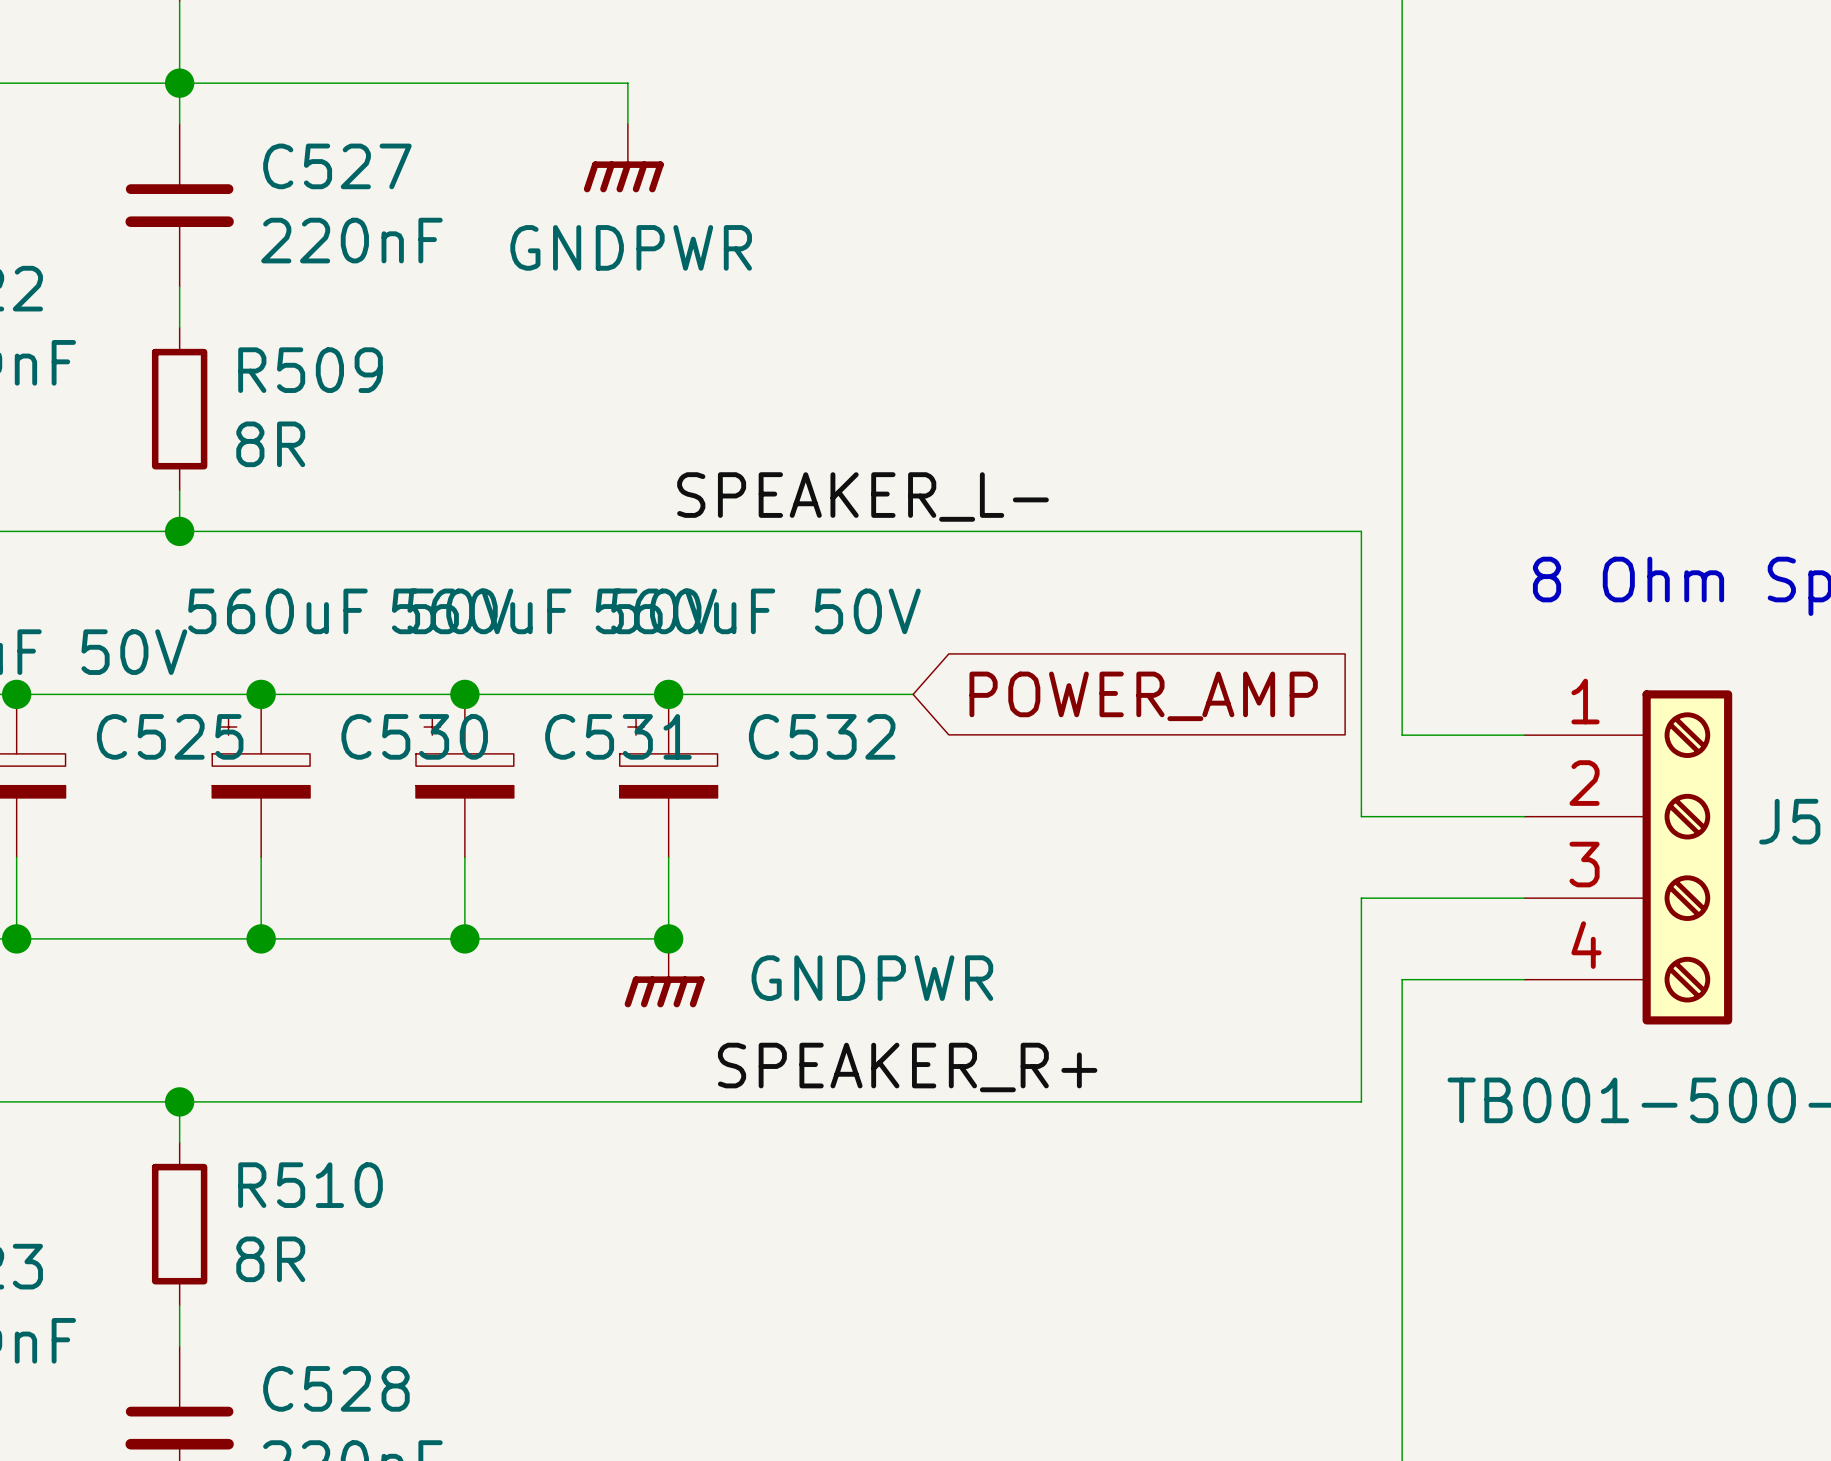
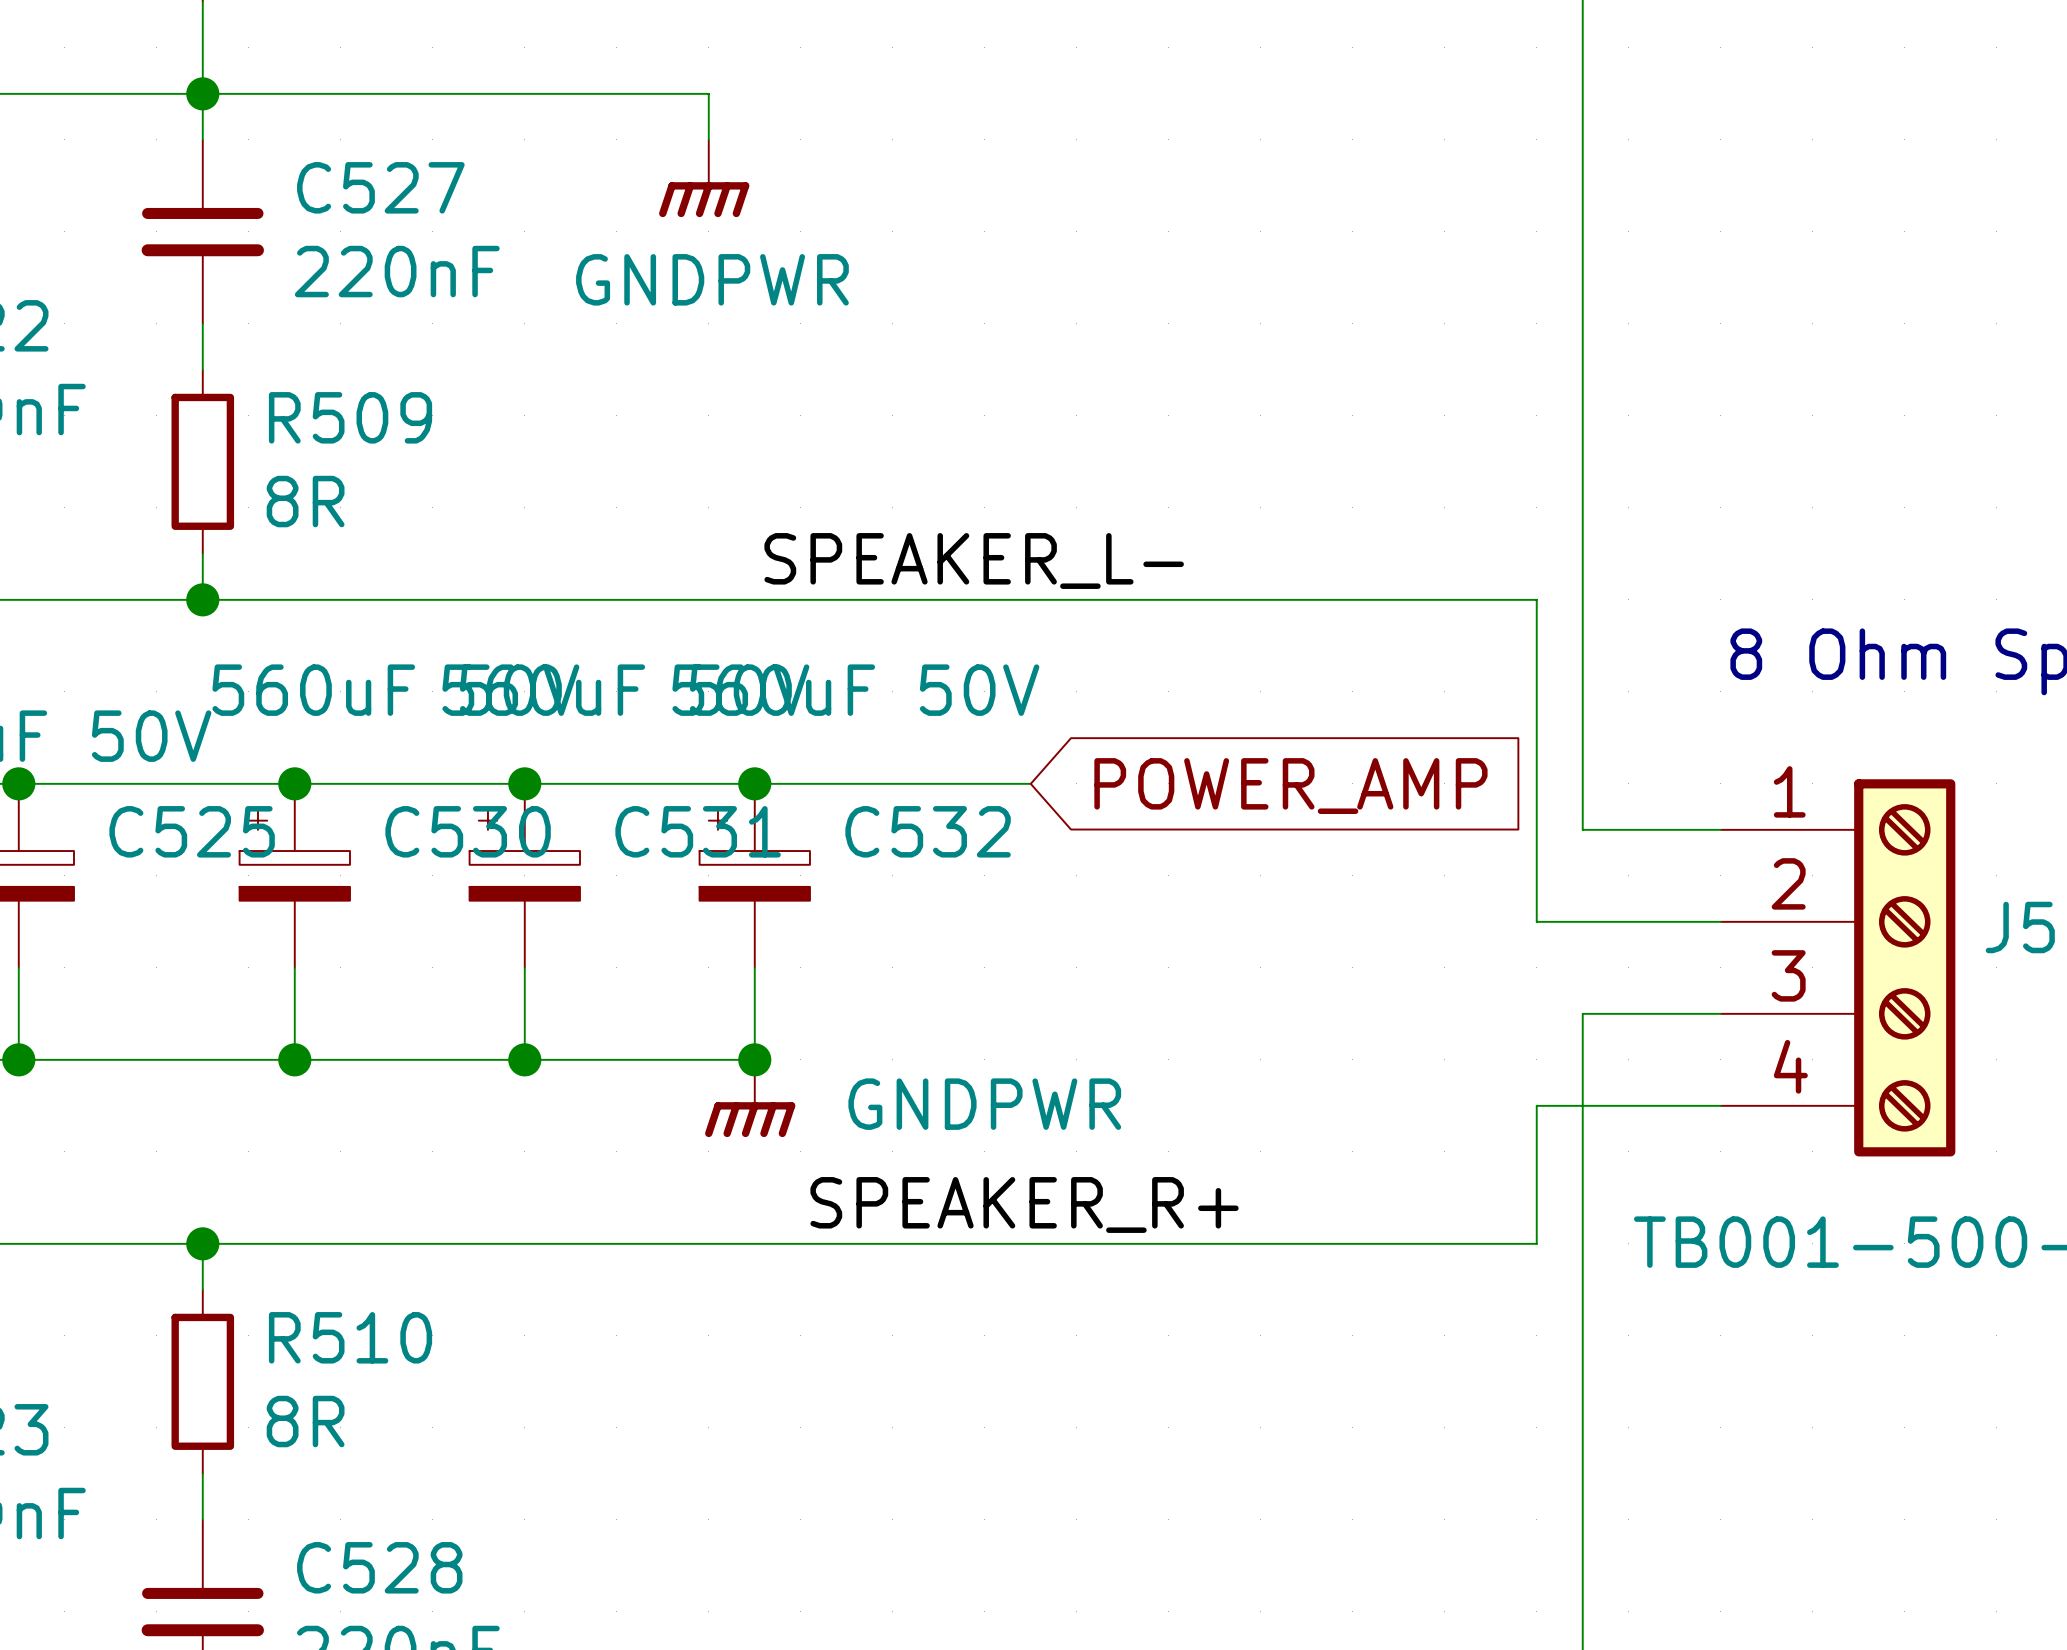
wire: (1402, 898) (1361, 898) (1361, 979) -> (1582, 1013) (1582, 1105) (1536, 1105)

